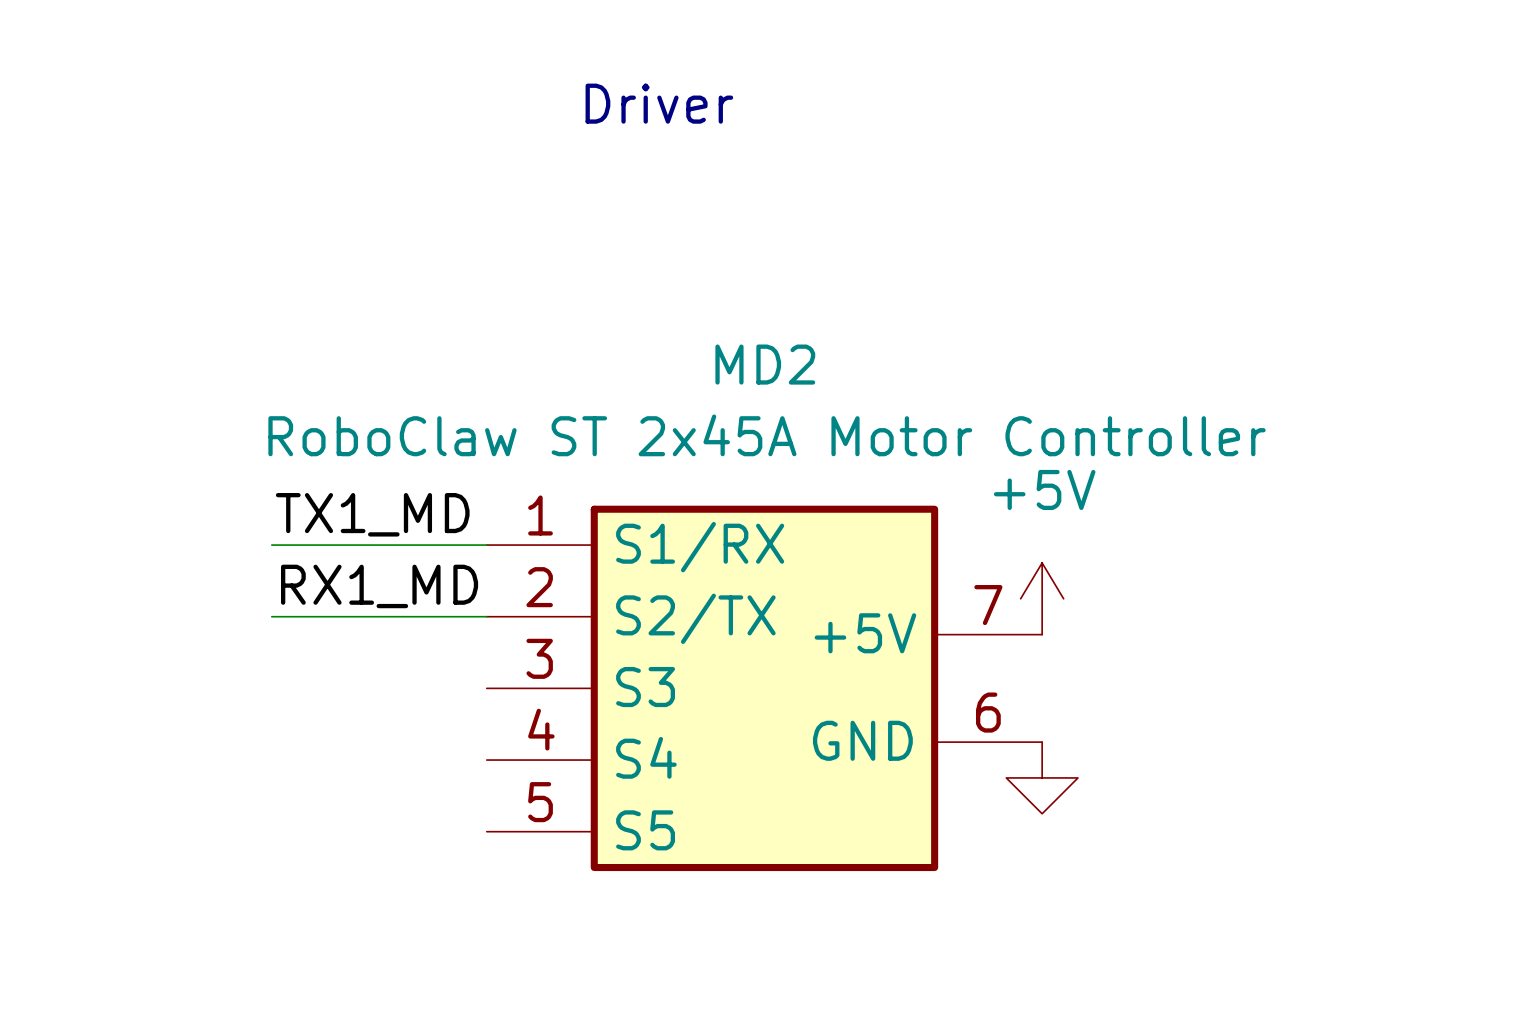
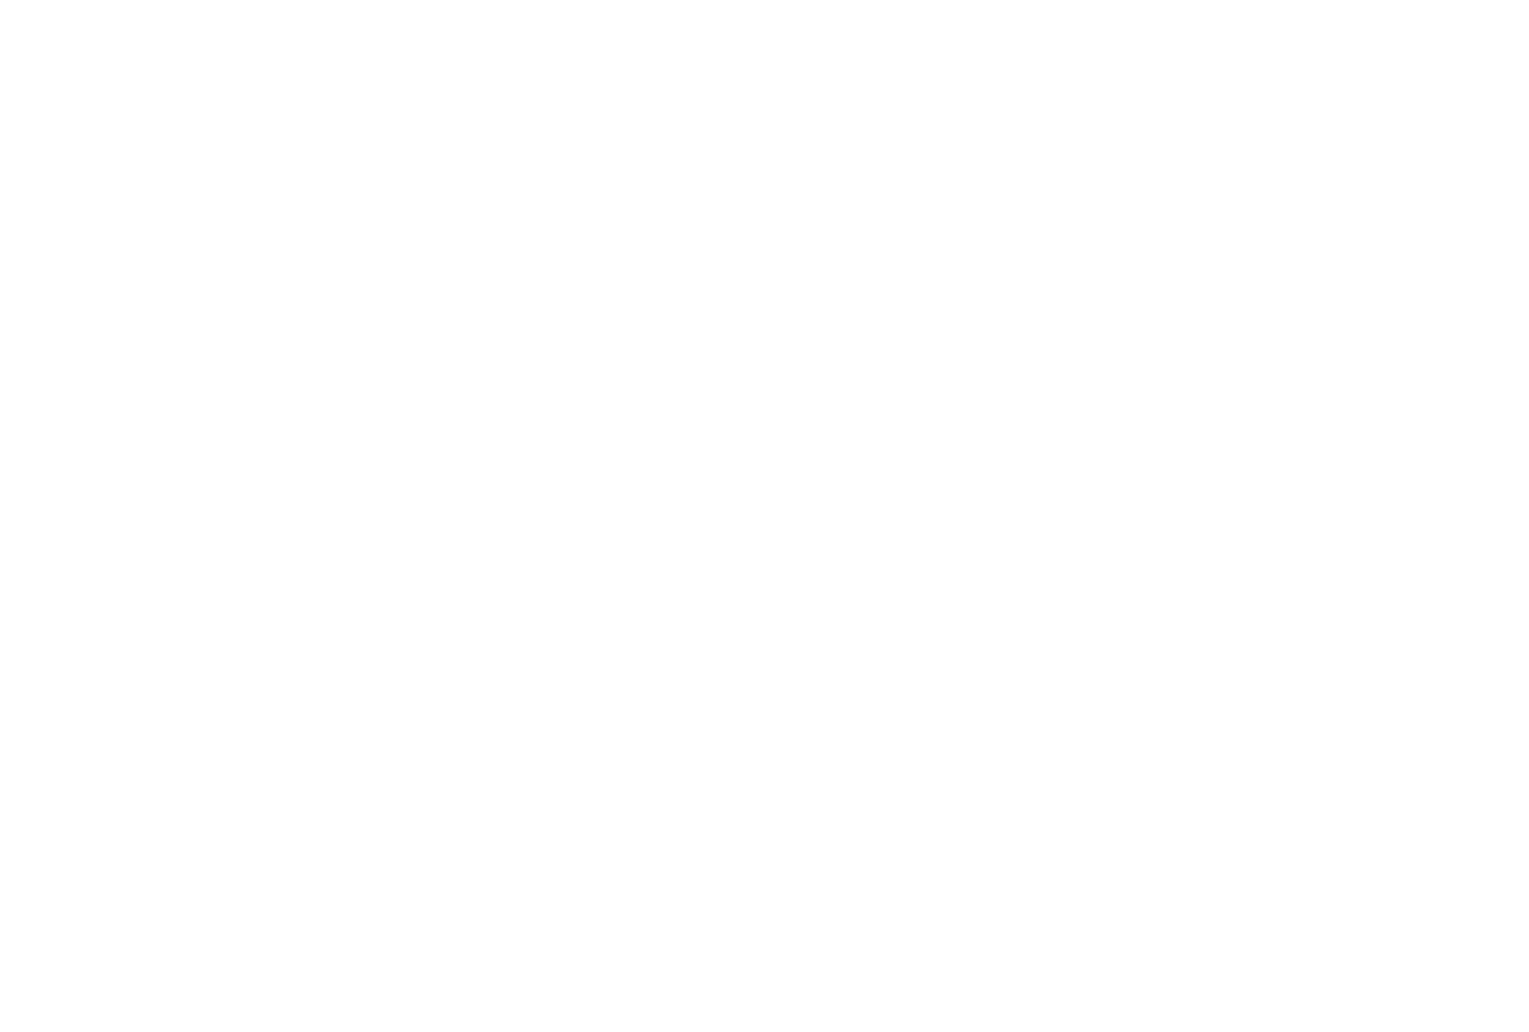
text: Driver (659, 103) -> none
label: TX1_MD (372, 514) -> none
wire: (271, 545) (486, 545) -> none
label: RX1_MD (379, 586) -> none
power symbol: +5V (1042, 598) -> none
wire: (271, 616) (486, 616) -> none
MD2: RoboClaw ST 2x45A Motor Controller (764, 688) -> none
power symbol: (1042, 777) -> none

